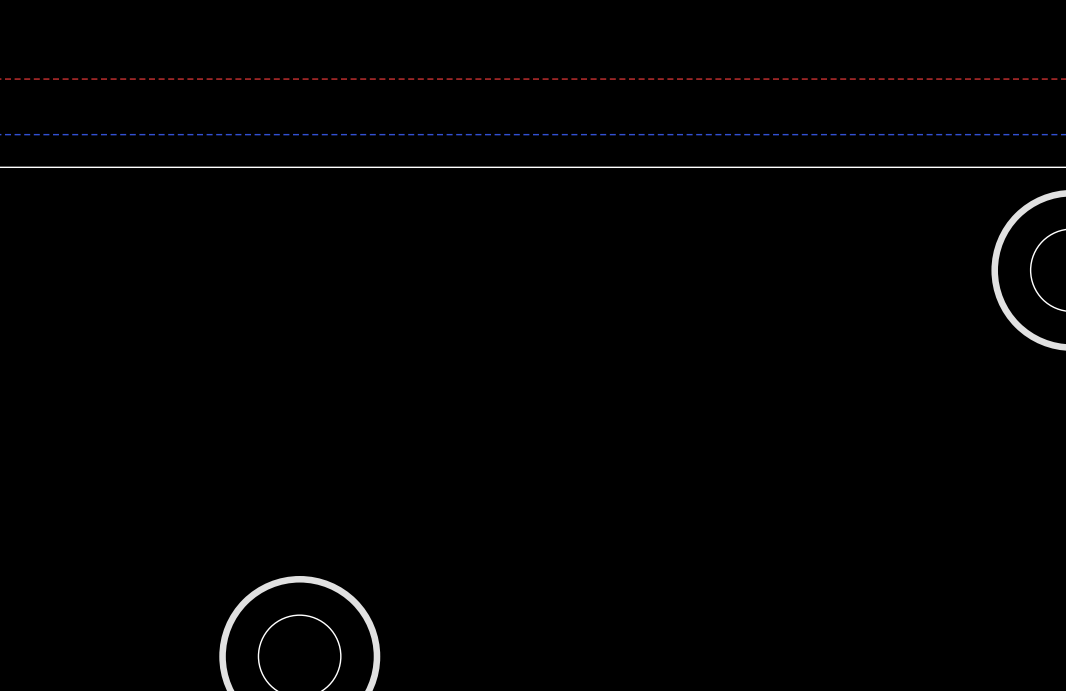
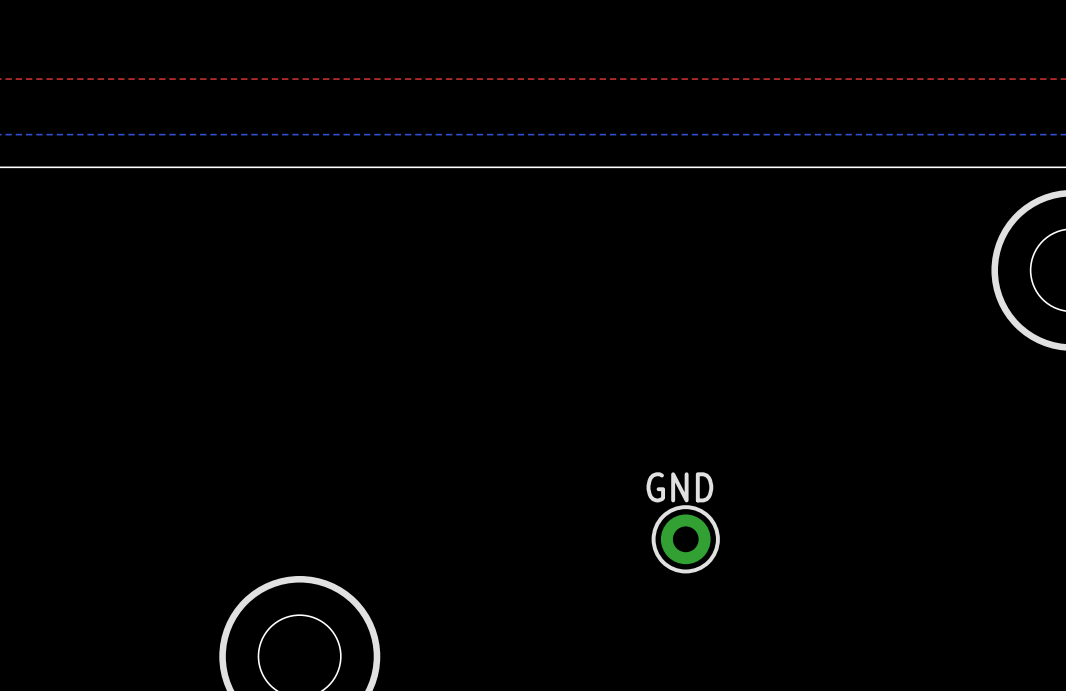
GND: none -> (685, 539)

